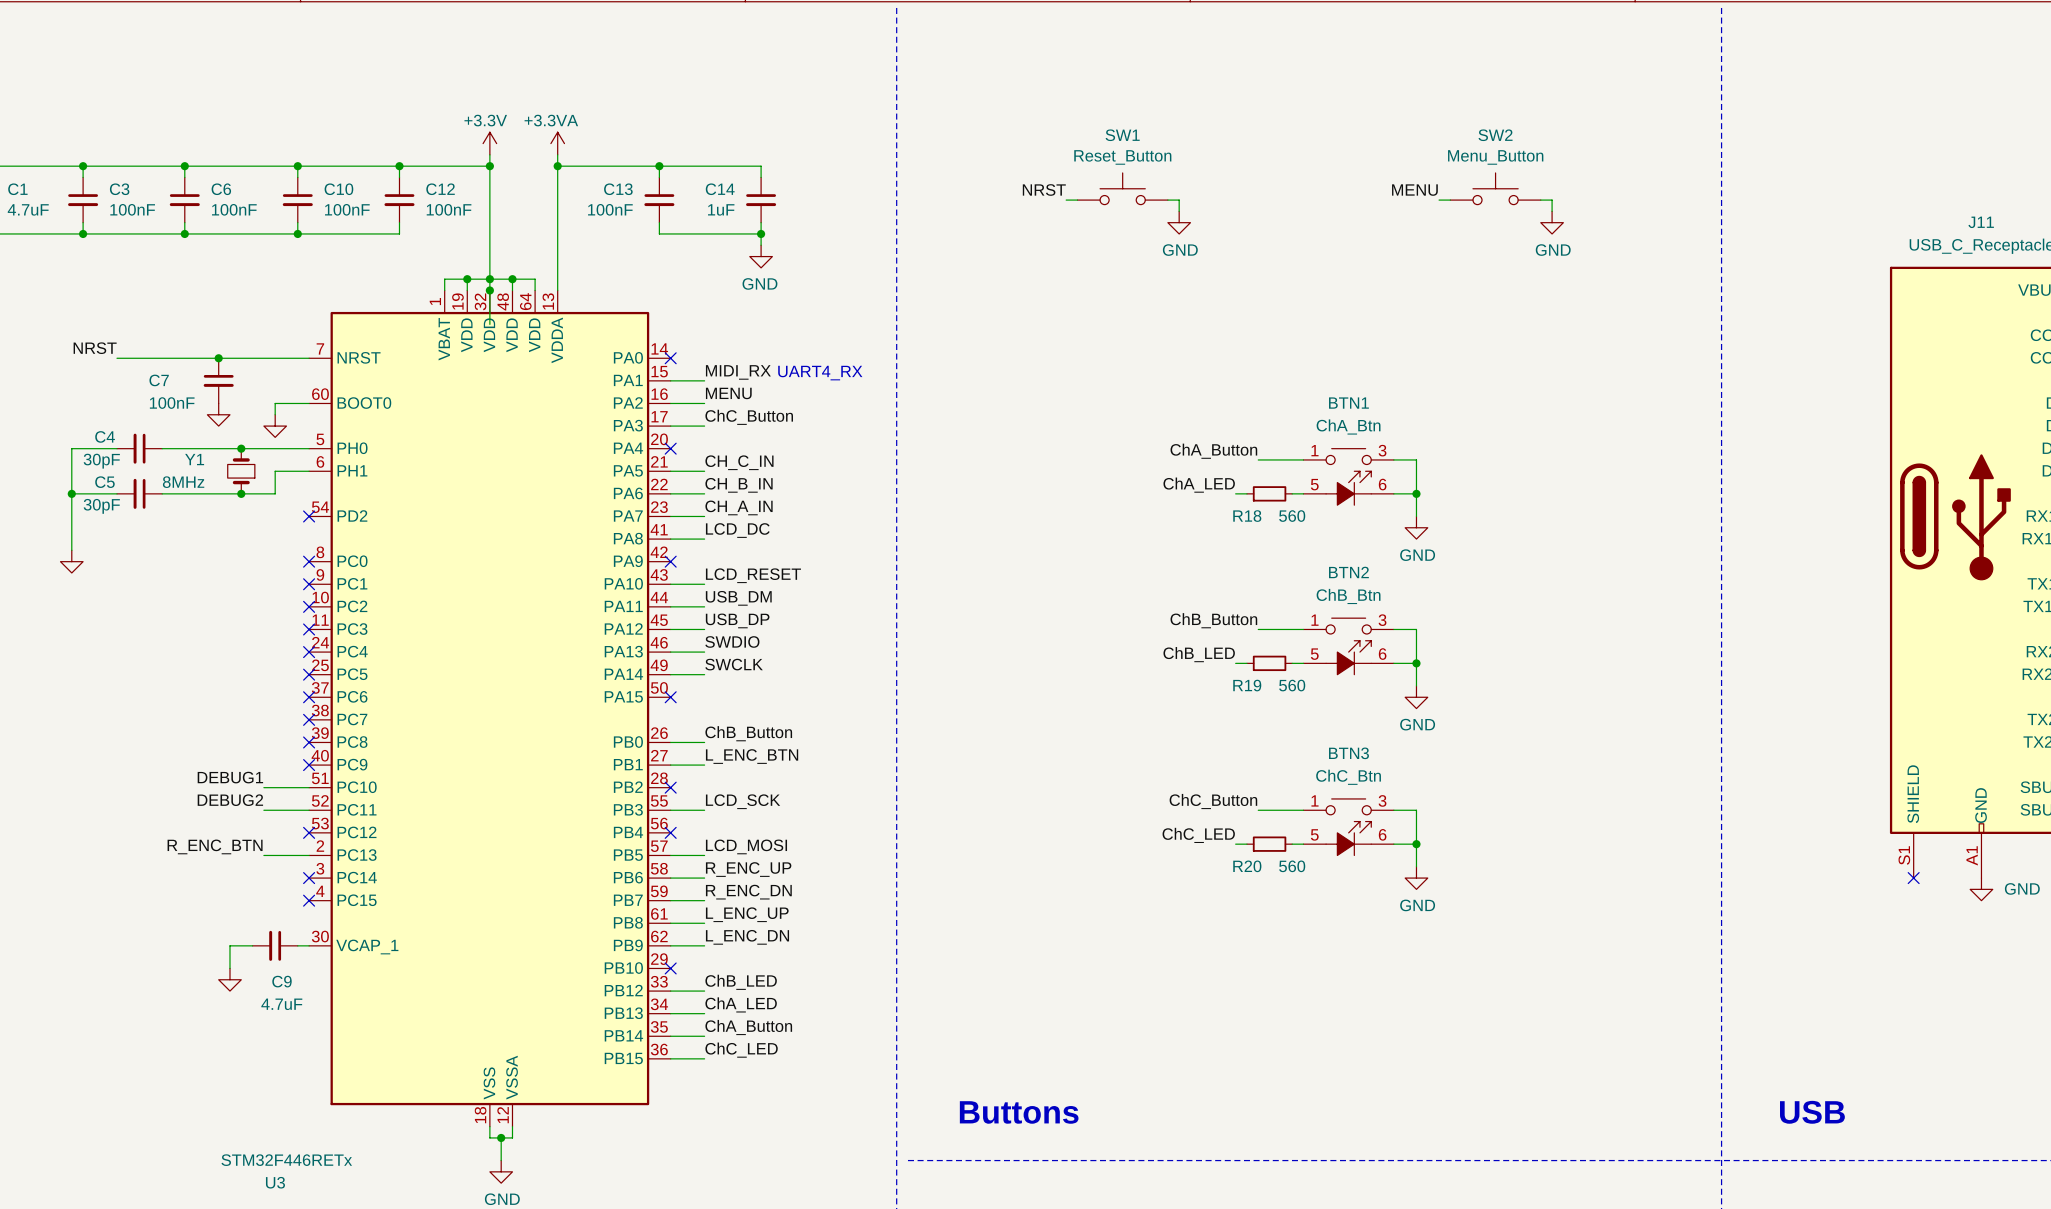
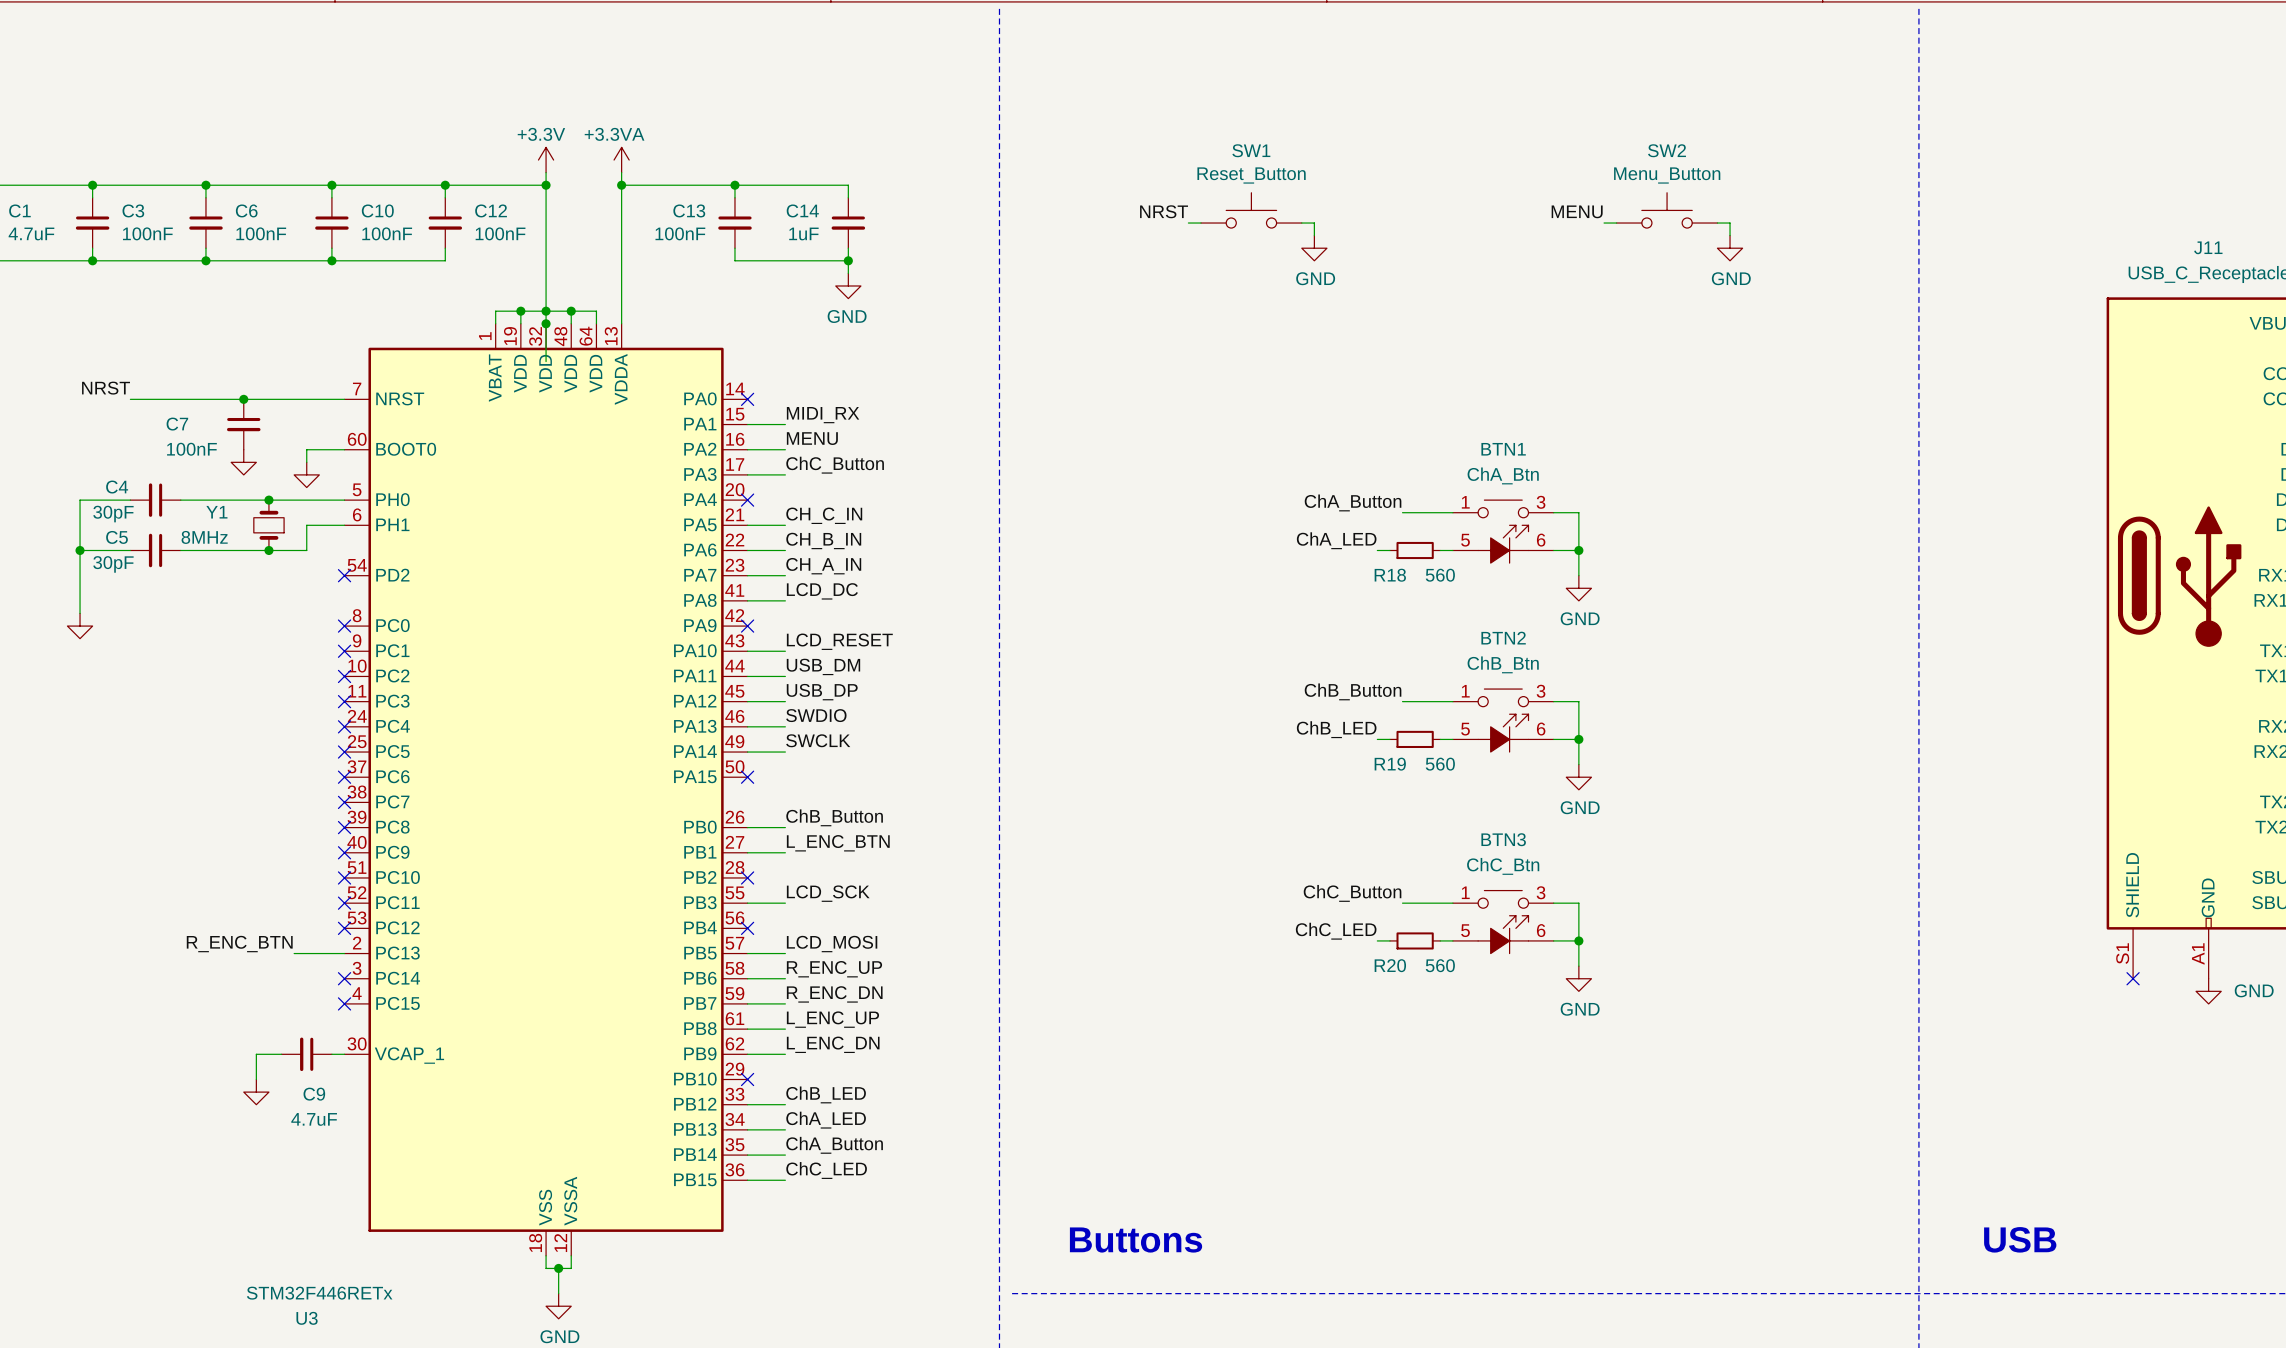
text: UART4_RX (820, 373) -> none
label: DEBUG1 (230, 777) -> none
wire: (263, 787) (309, 787) -> none
no-connect mark: none -> (344, 877)
label: DEBUG2 (230, 800) -> none
wire: (263, 810) (309, 810) -> none
no-connect mark: none -> (344, 903)

